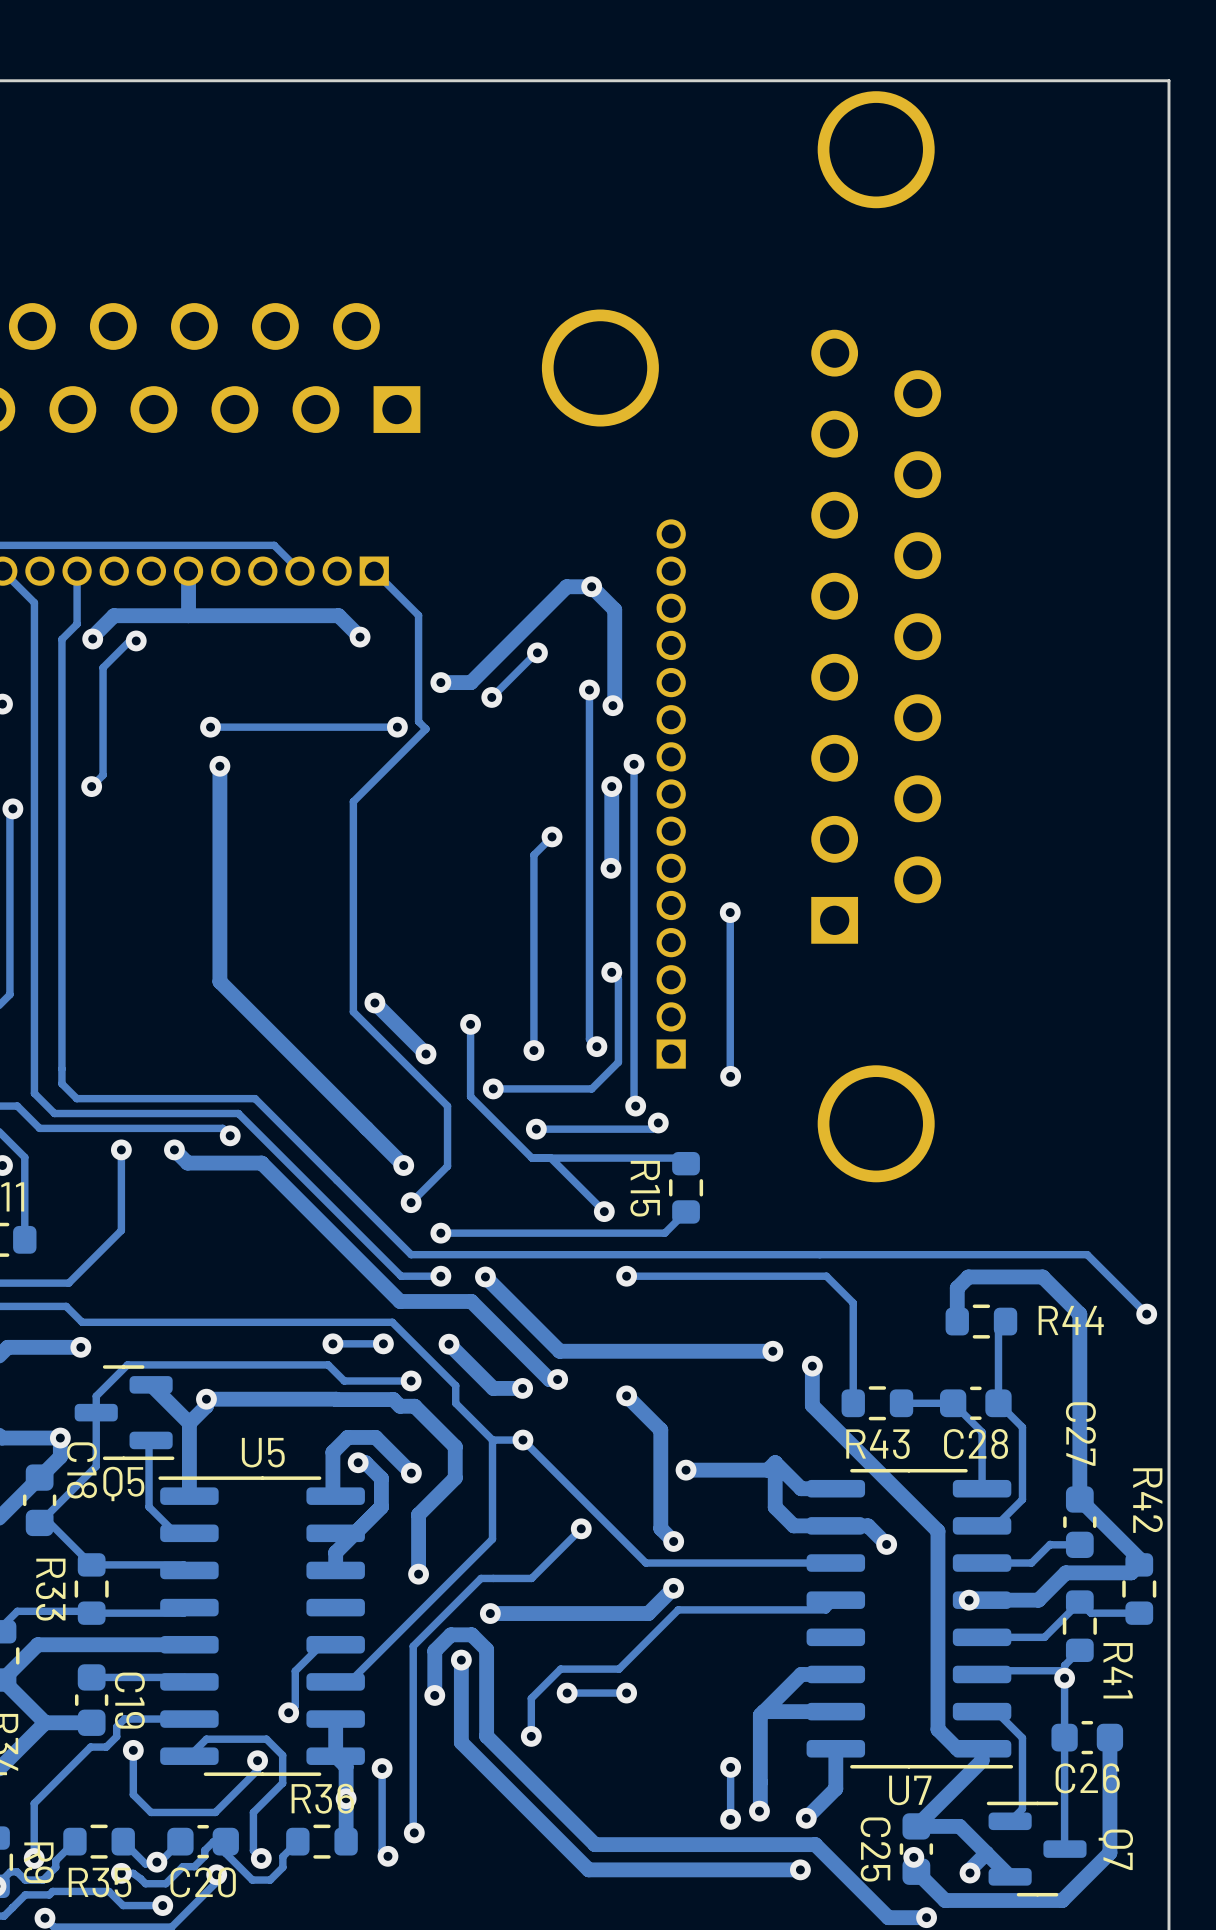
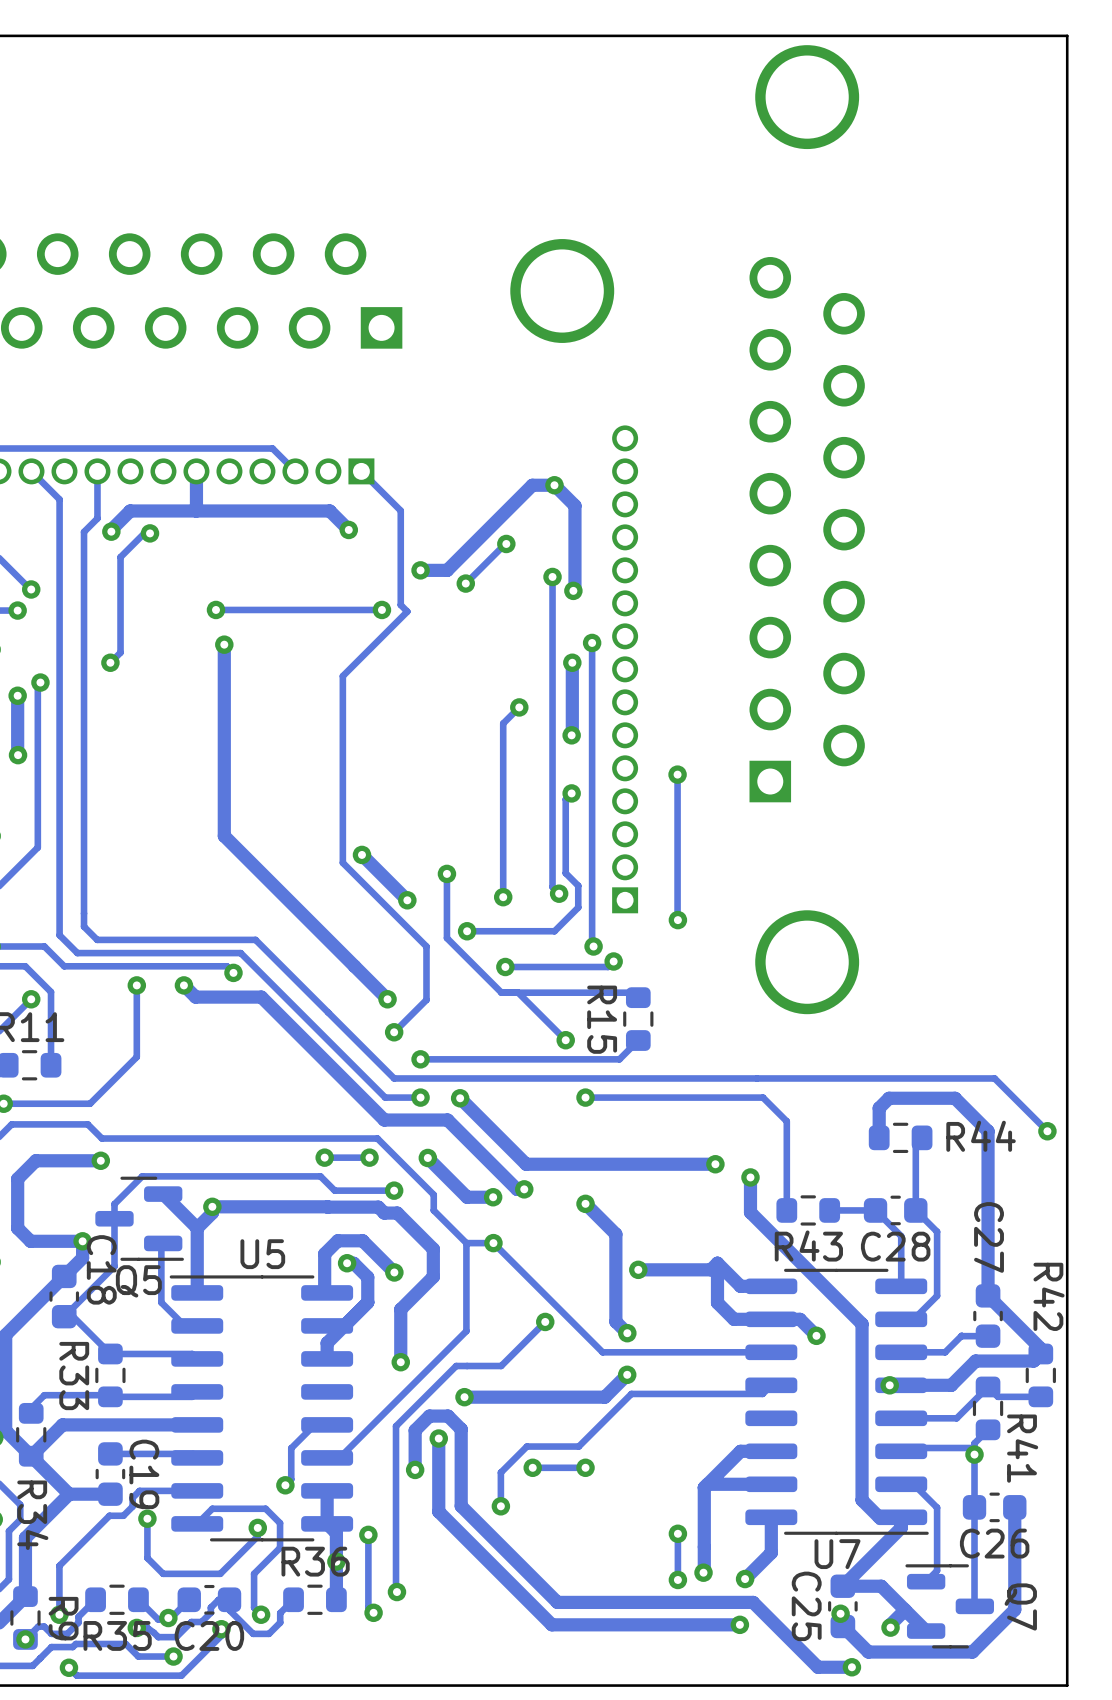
track: (611, 972) (618, 979) (618, 1037) -> (571, 793) (565, 799) (565, 873) (578, 885)
via position: (611, 972) -> (571, 793)

